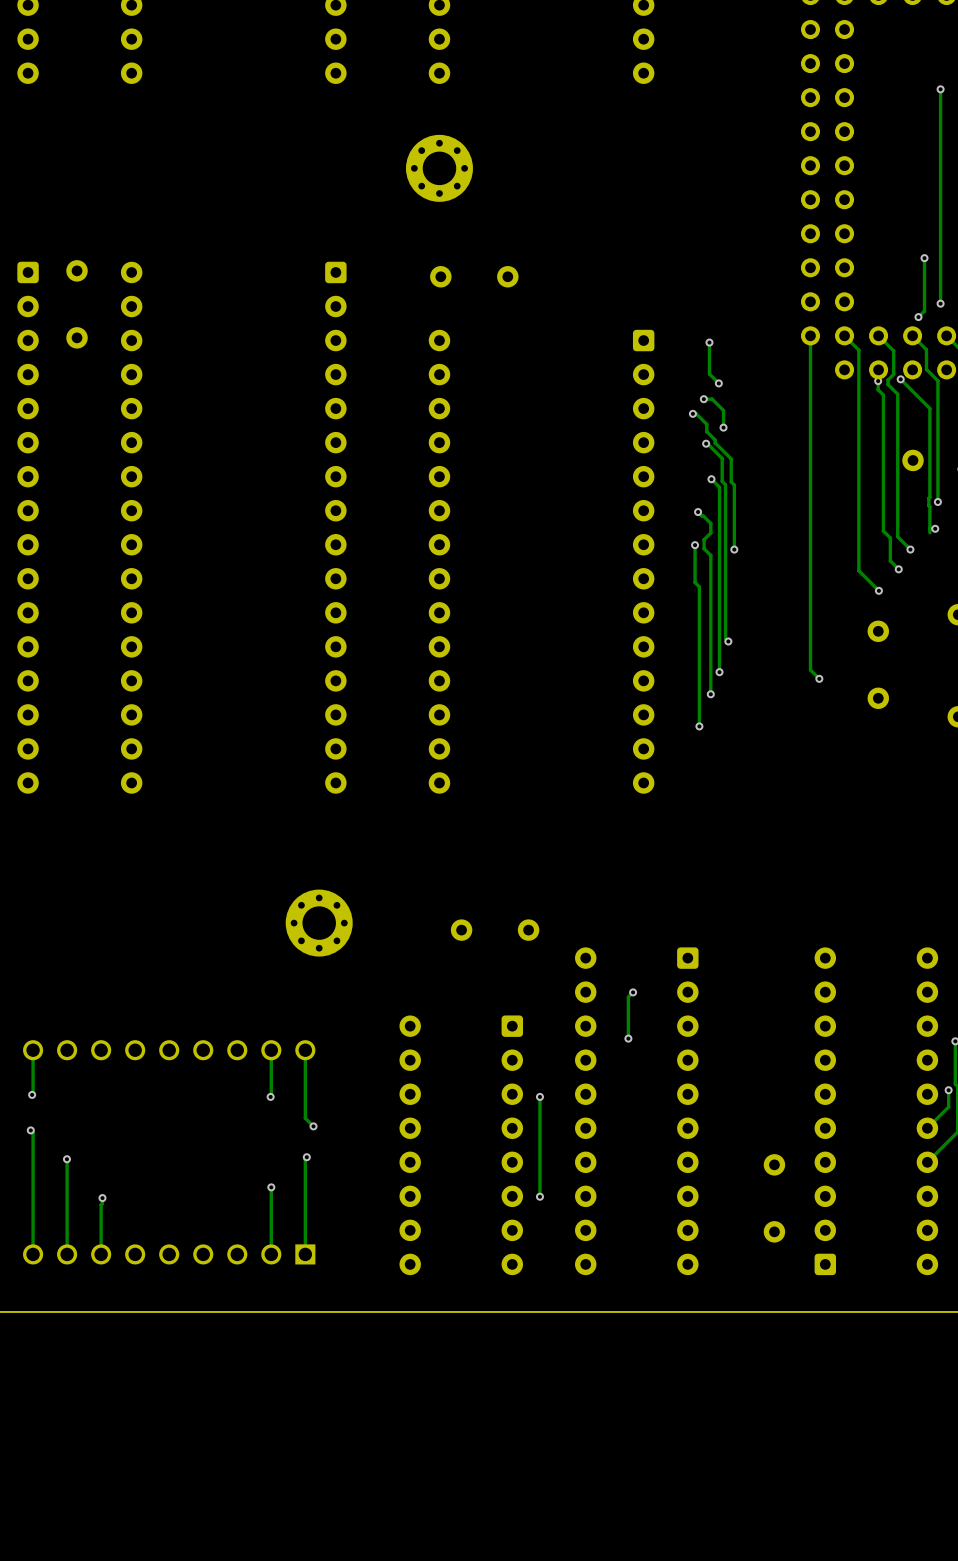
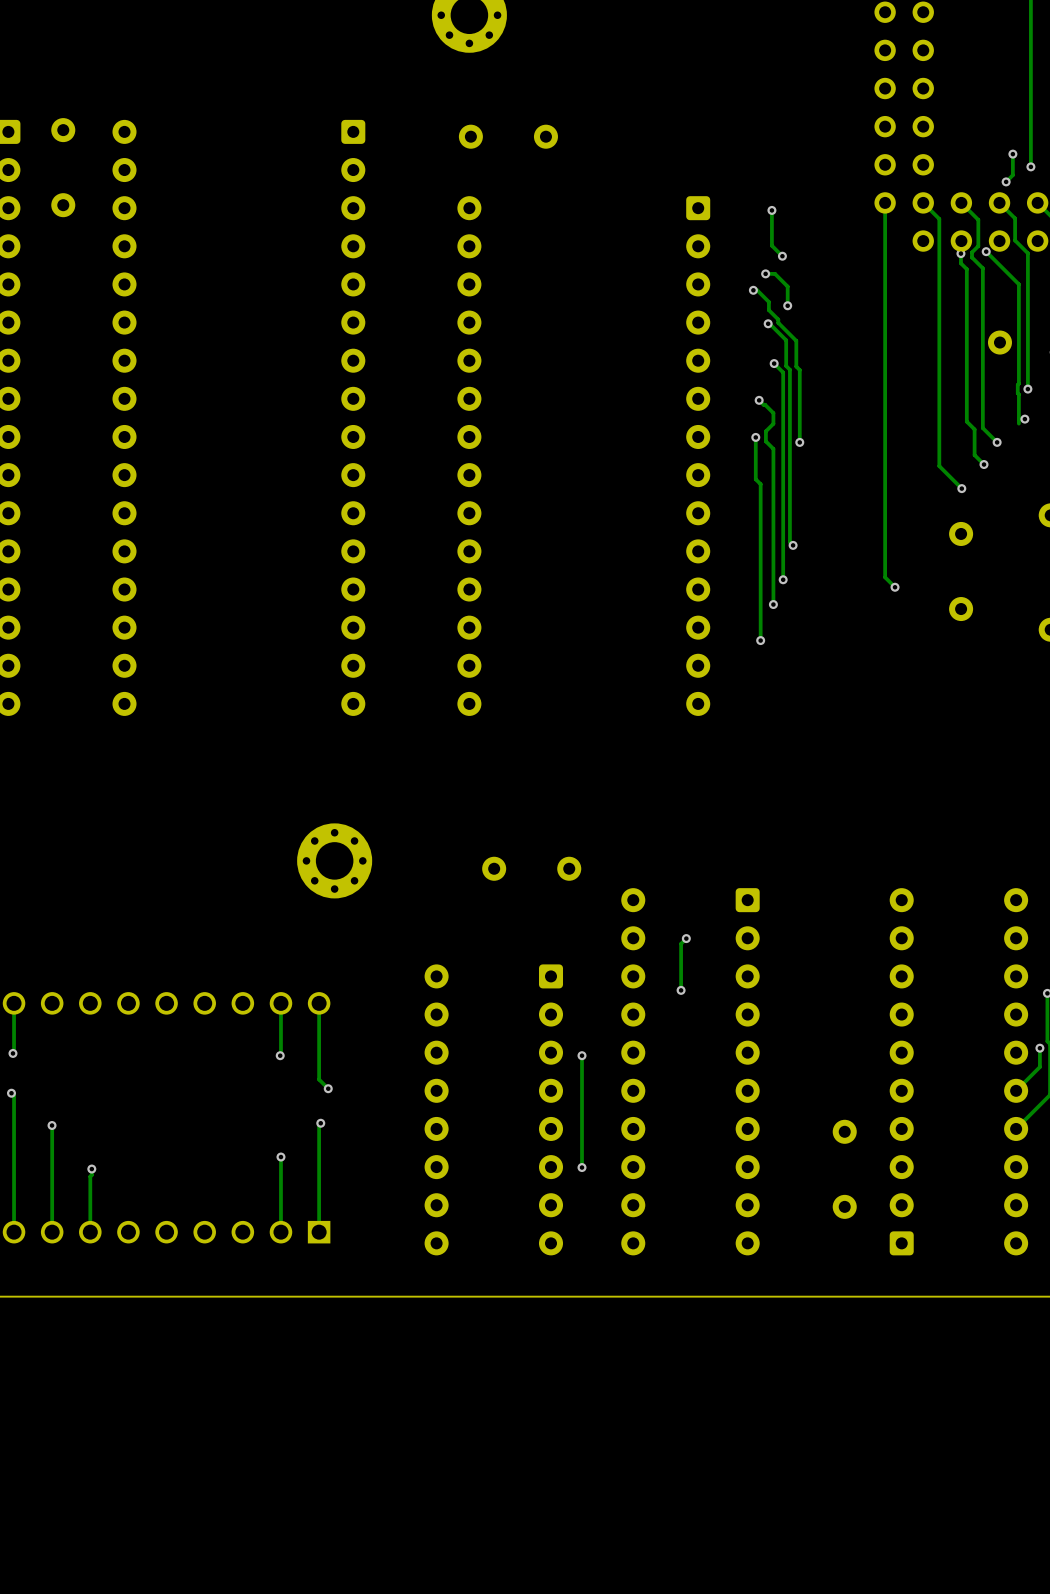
track: (924, 258) (924, 292) -> none
via position: (924, 258) -> (1012, 154)

